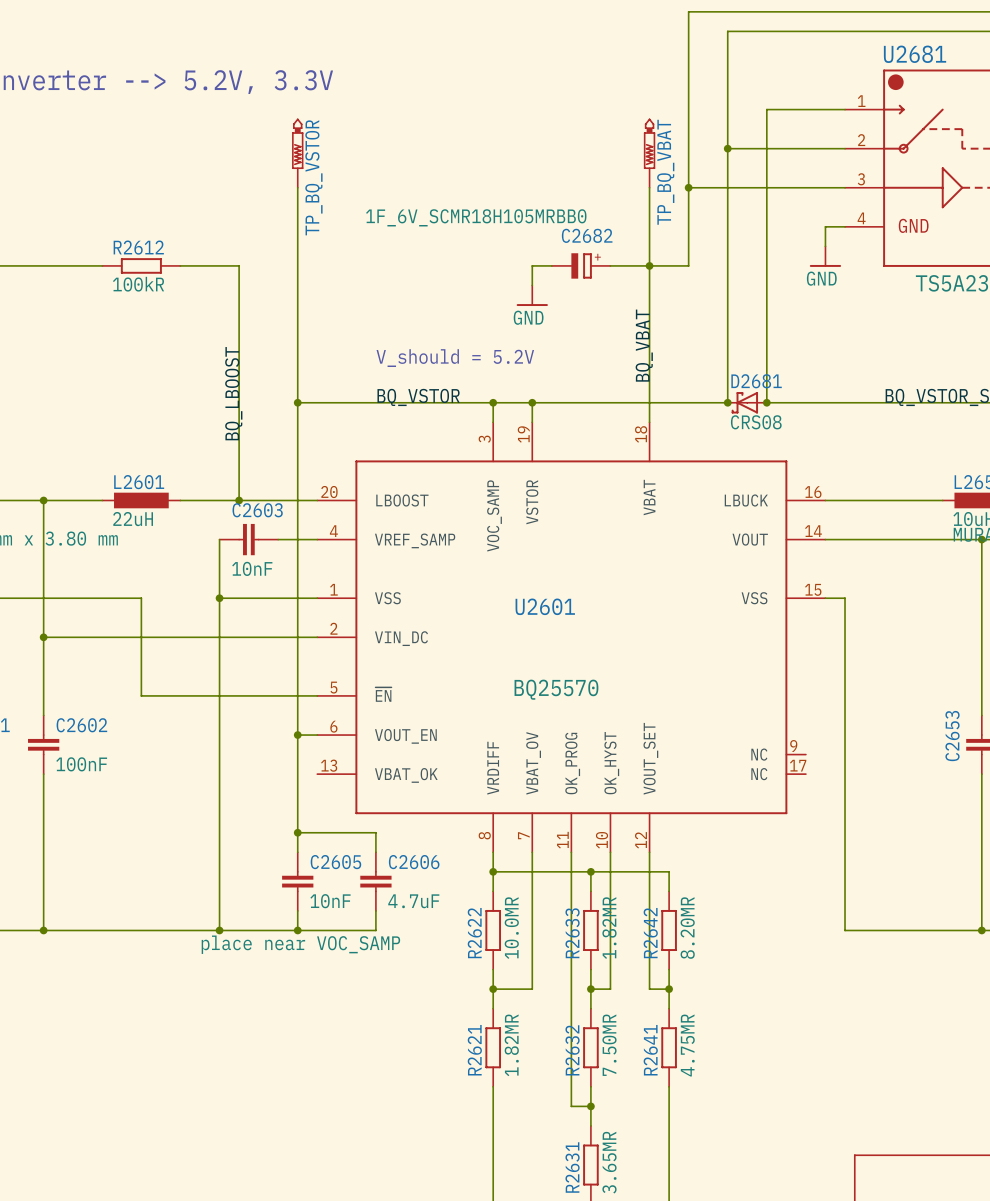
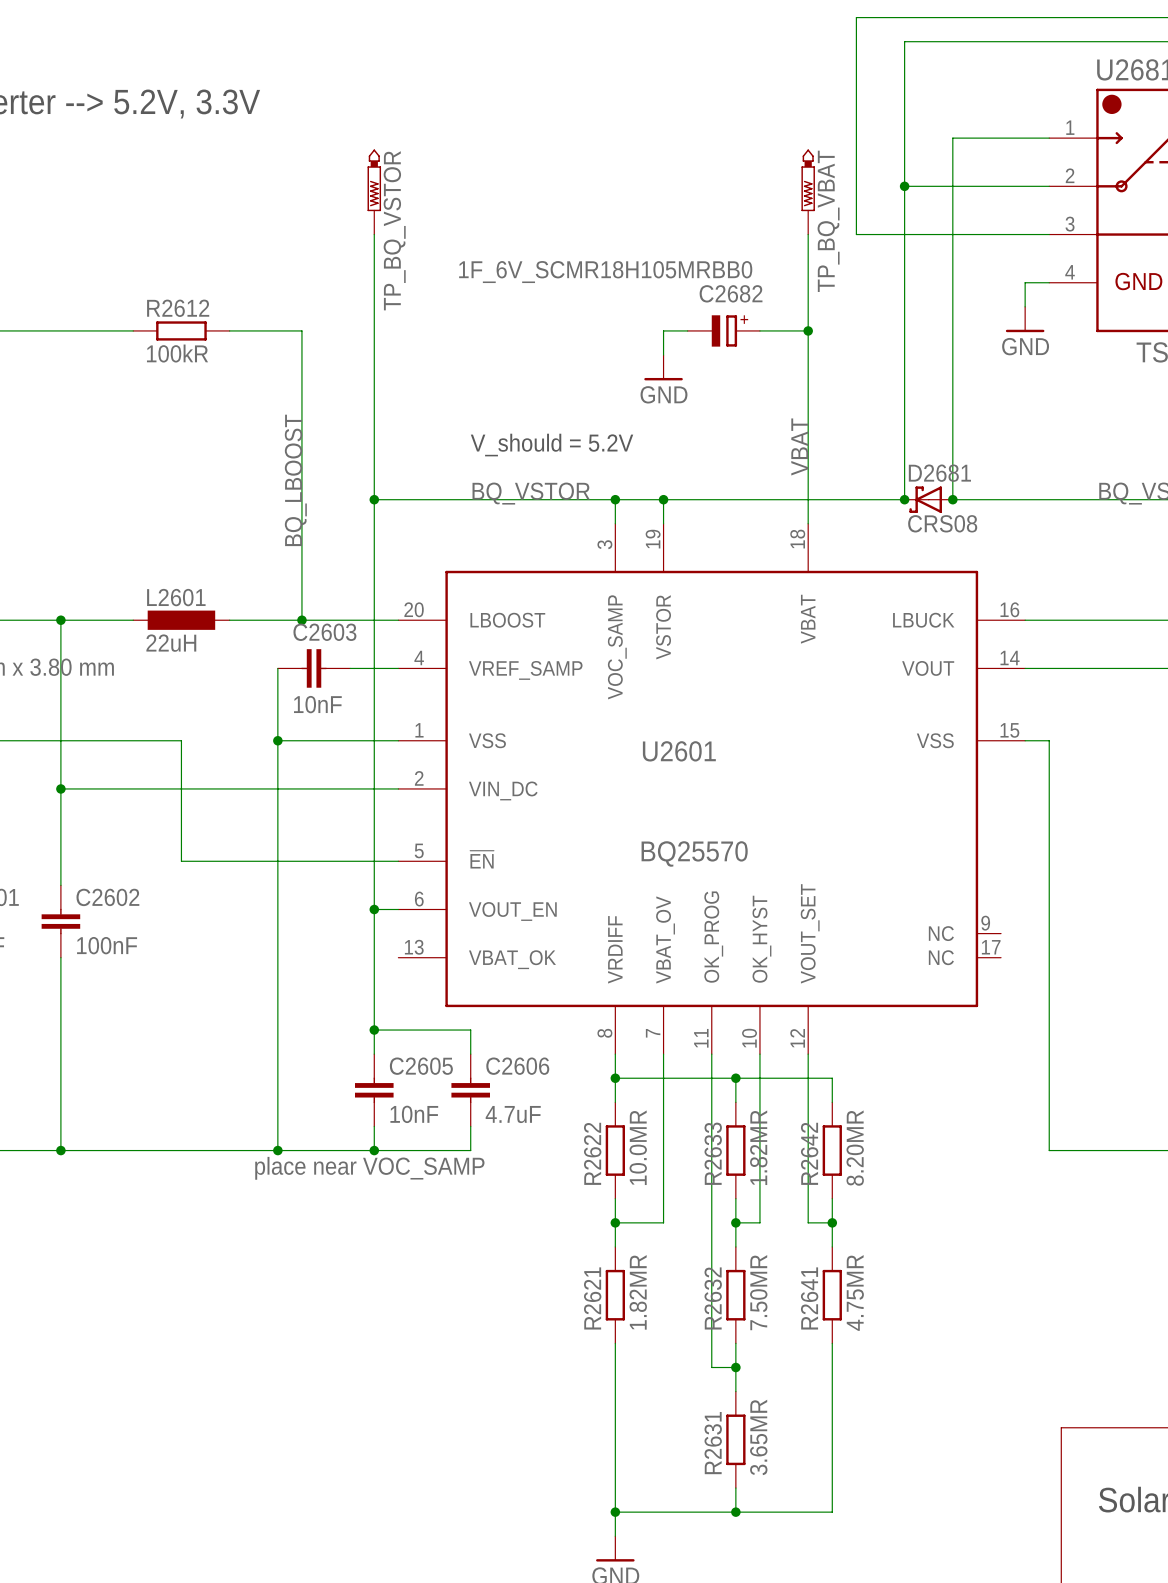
wire: (688, 187) (688, 265) (649, 265) -> none
junction: (688, 187) -> none
label: BQ_VBAT (644, 345) -> VBAT (799, 446)

